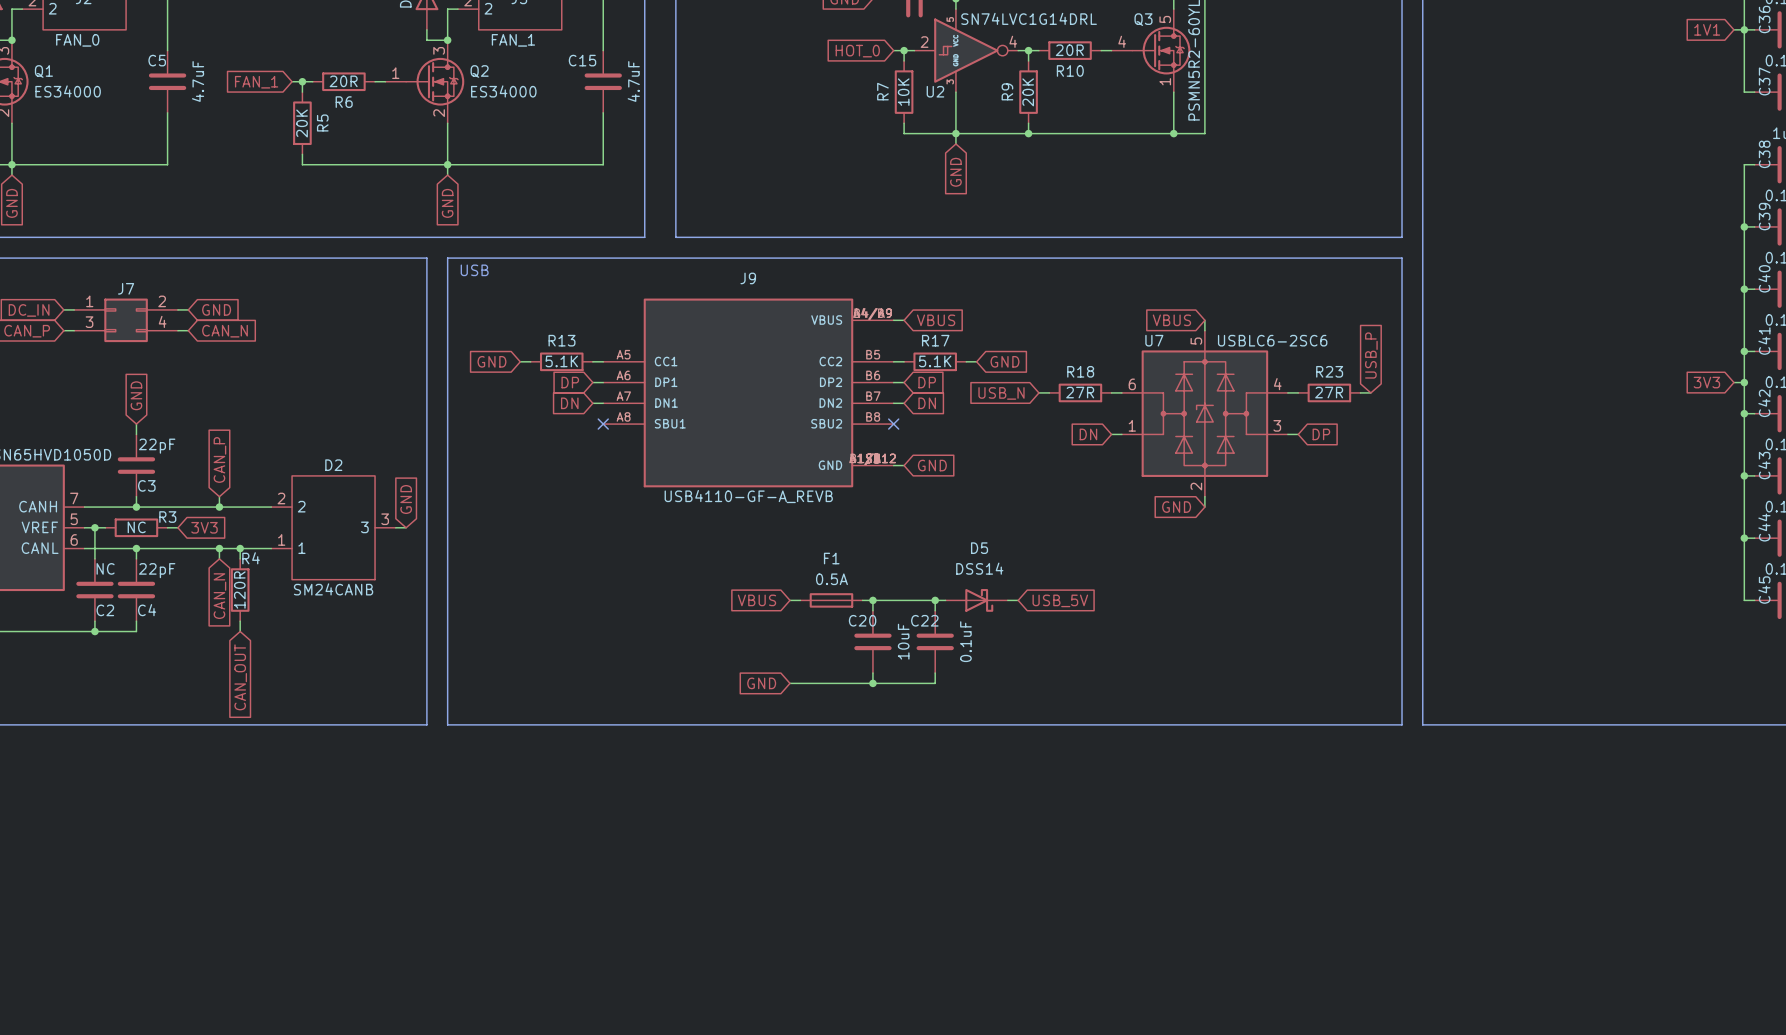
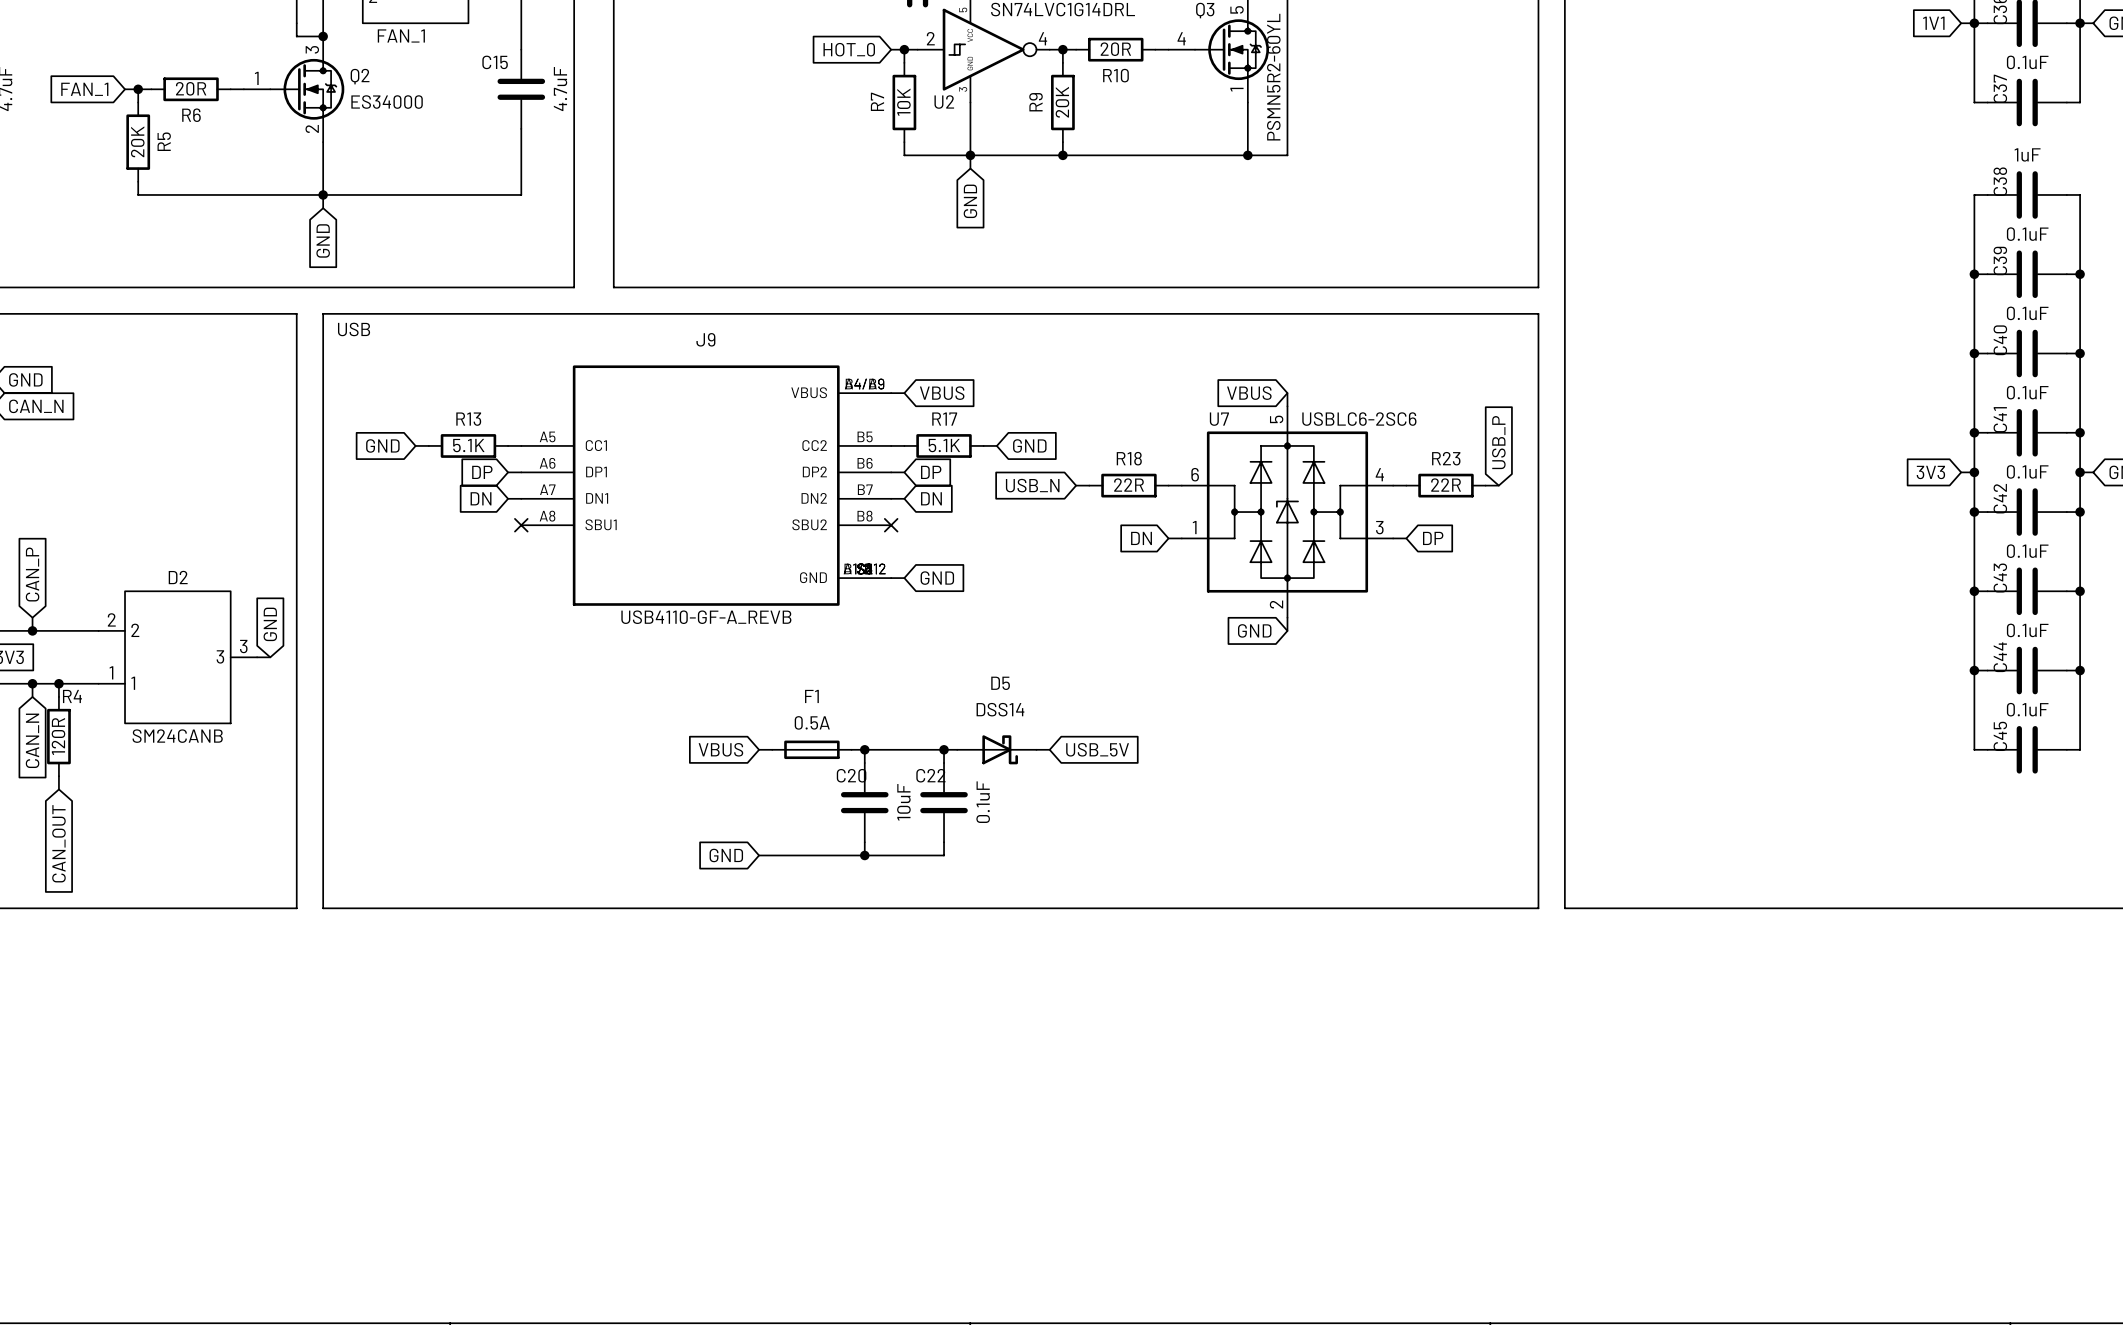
R18 value: 27R (1080, 392) -> 22R (1129, 485)
R23 value: 27R (1329, 392) -> 22R (1446, 485)

